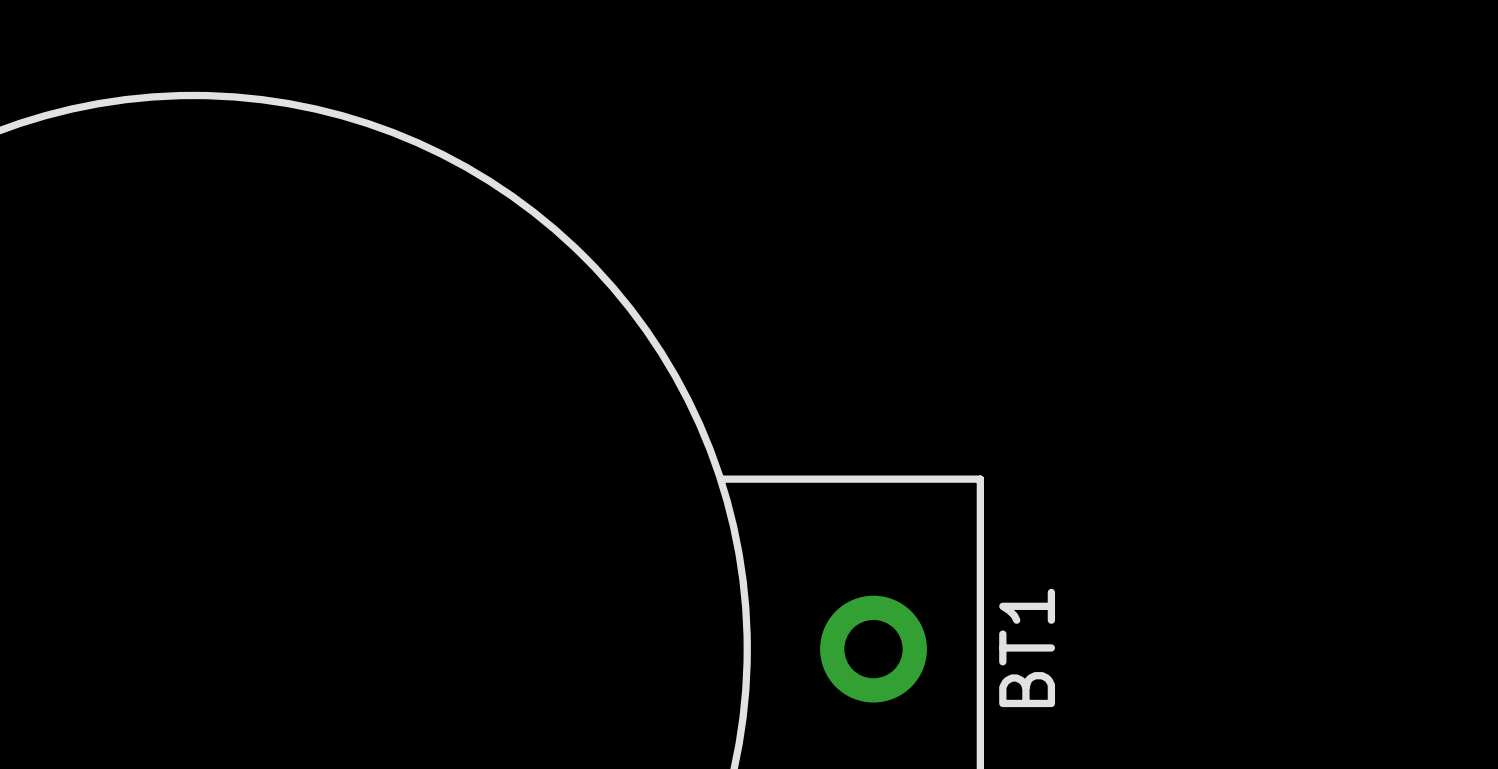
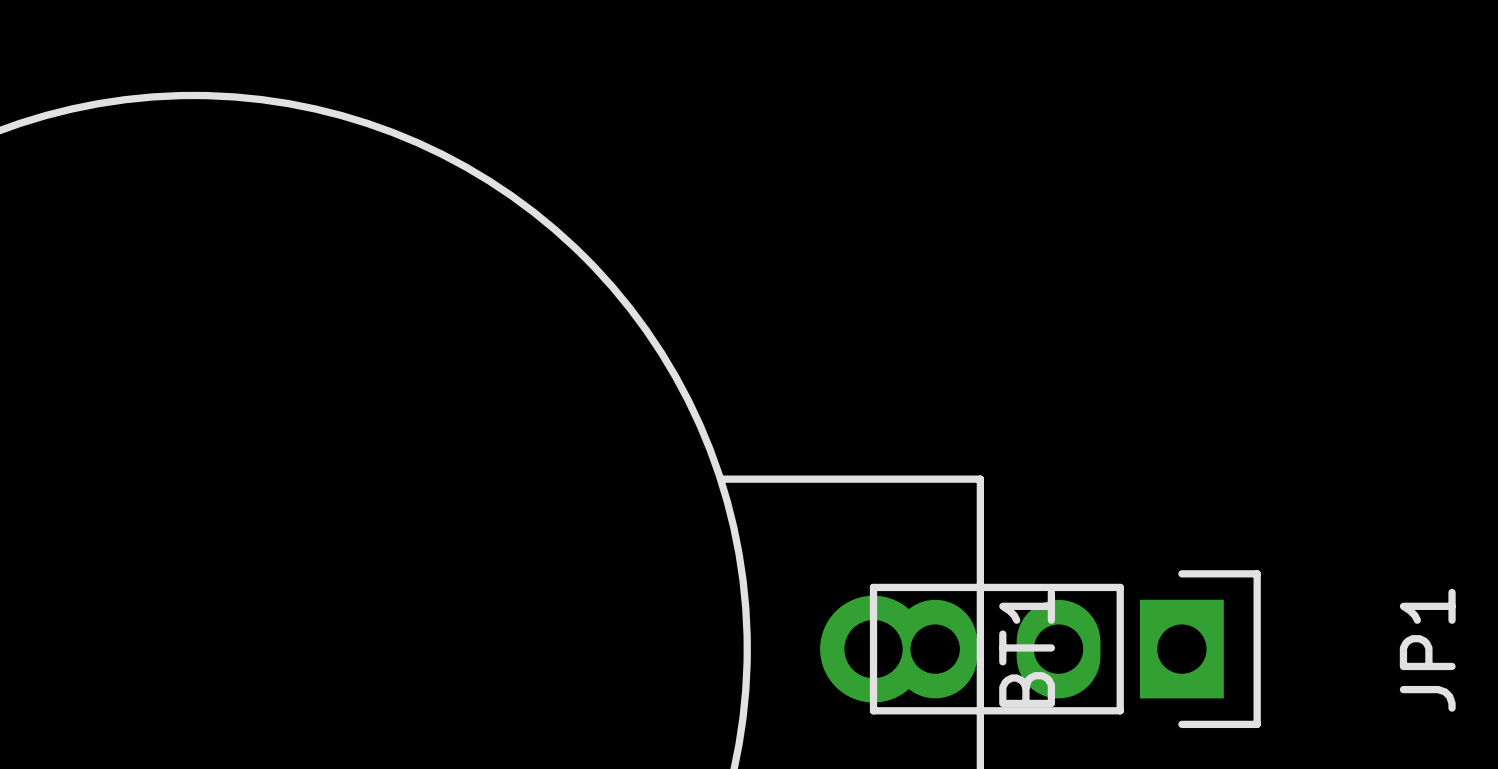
JP1: none -> (1065, 649)

